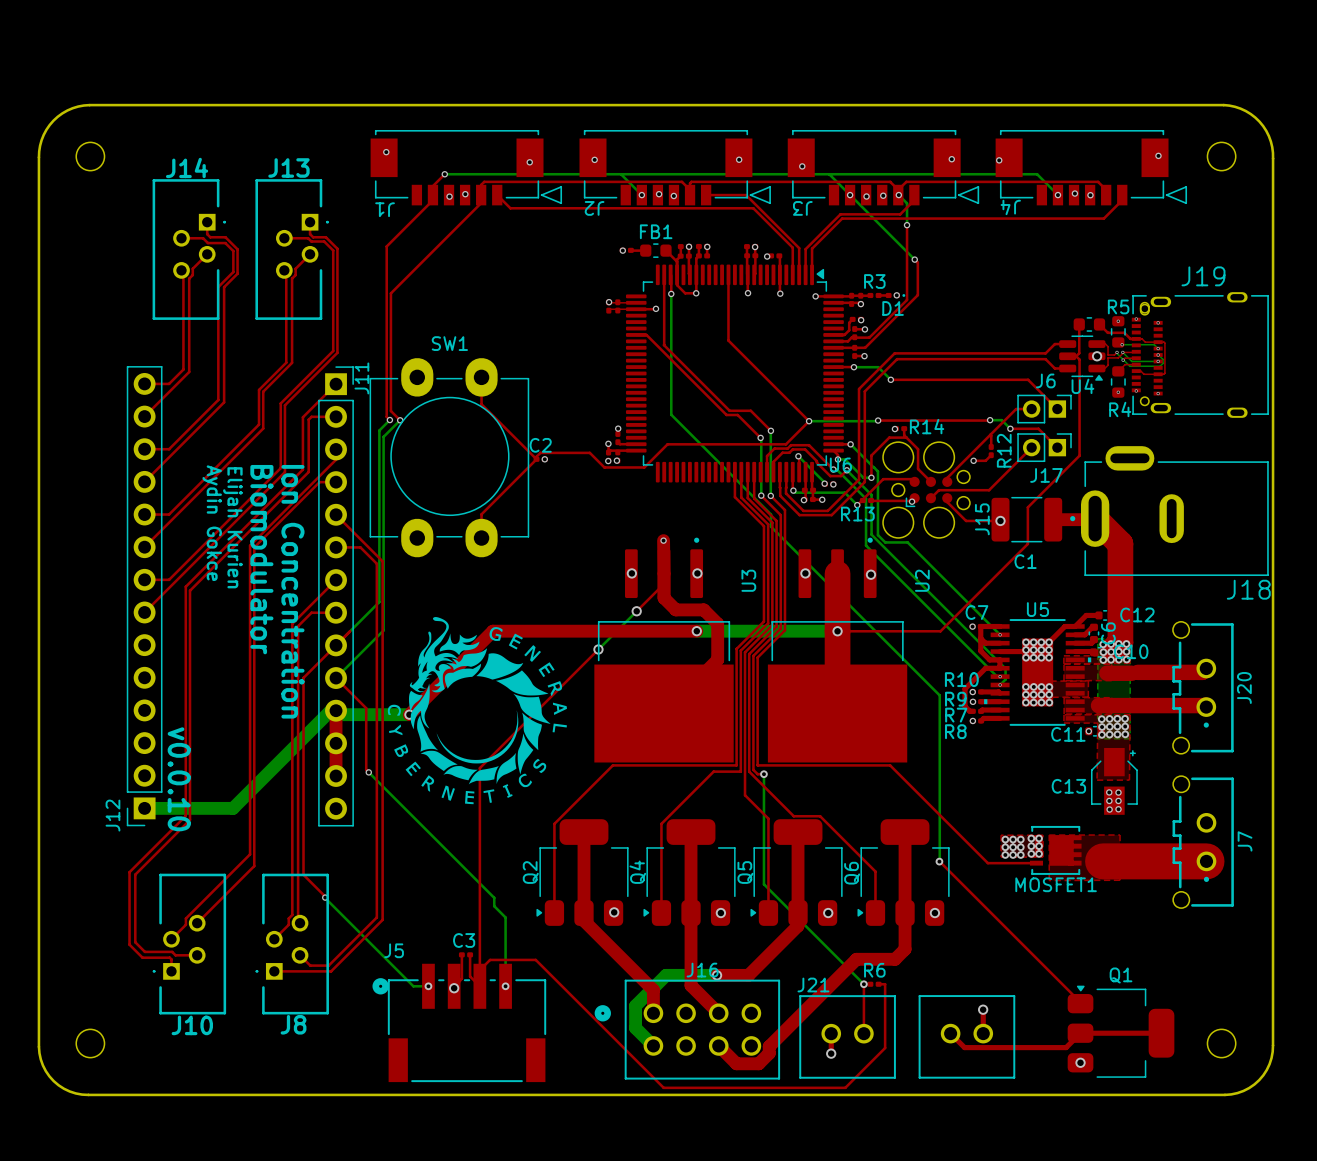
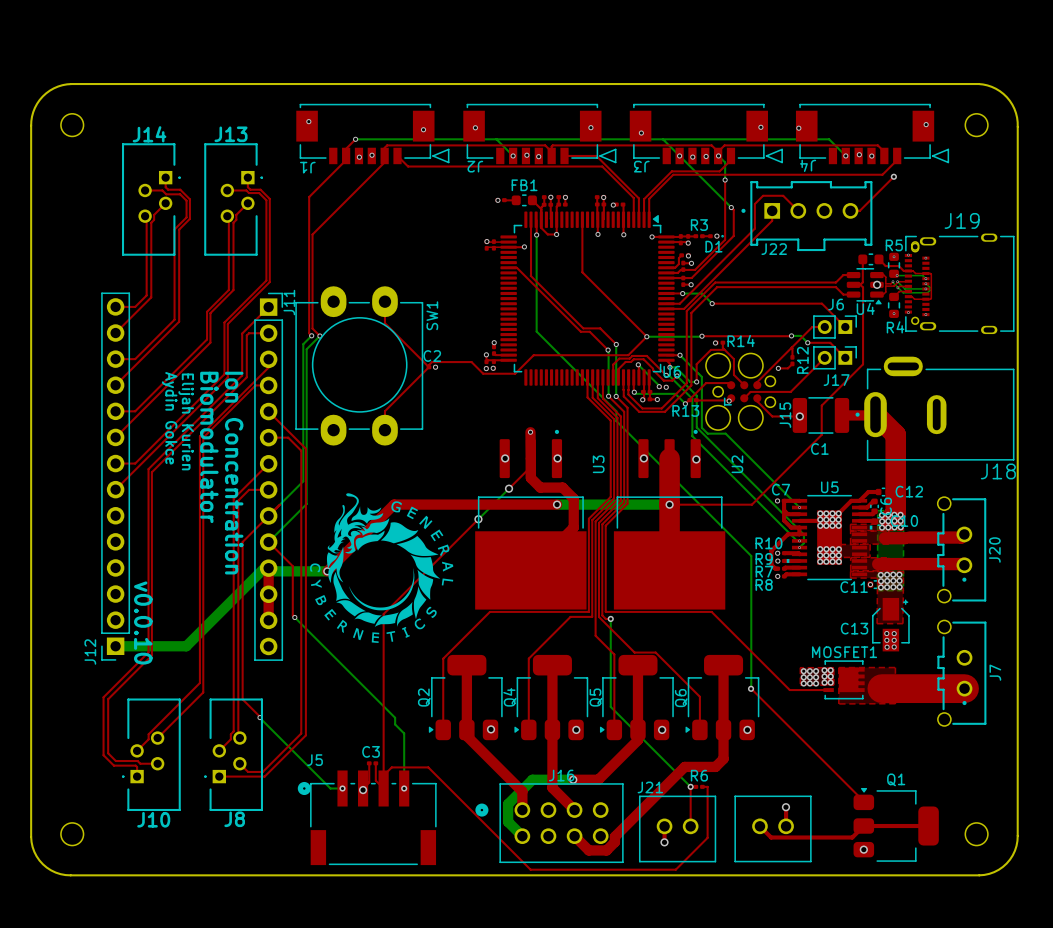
top track: none -> (893, 176) (859, 210) (850, 210)
via: none -> (893, 176)
top track: none -> (772, 210) (772, 220) (684, 308) (666, 308)
top track: none -> (798, 210) (783, 195) (763, 195) (754, 204) (754, 228) (679, 303) (666, 303)
J22: none -> (806, 216)
SW1 name rotation: 0° (449, 343) -> 90° counterclockwise (432, 315)
SW1 name position: SW1 (449, 343) -> SW1 (432, 315)
MOSFET1 name position: MOSFET1 (1056, 884) -> MOSFET1 (844, 652)

